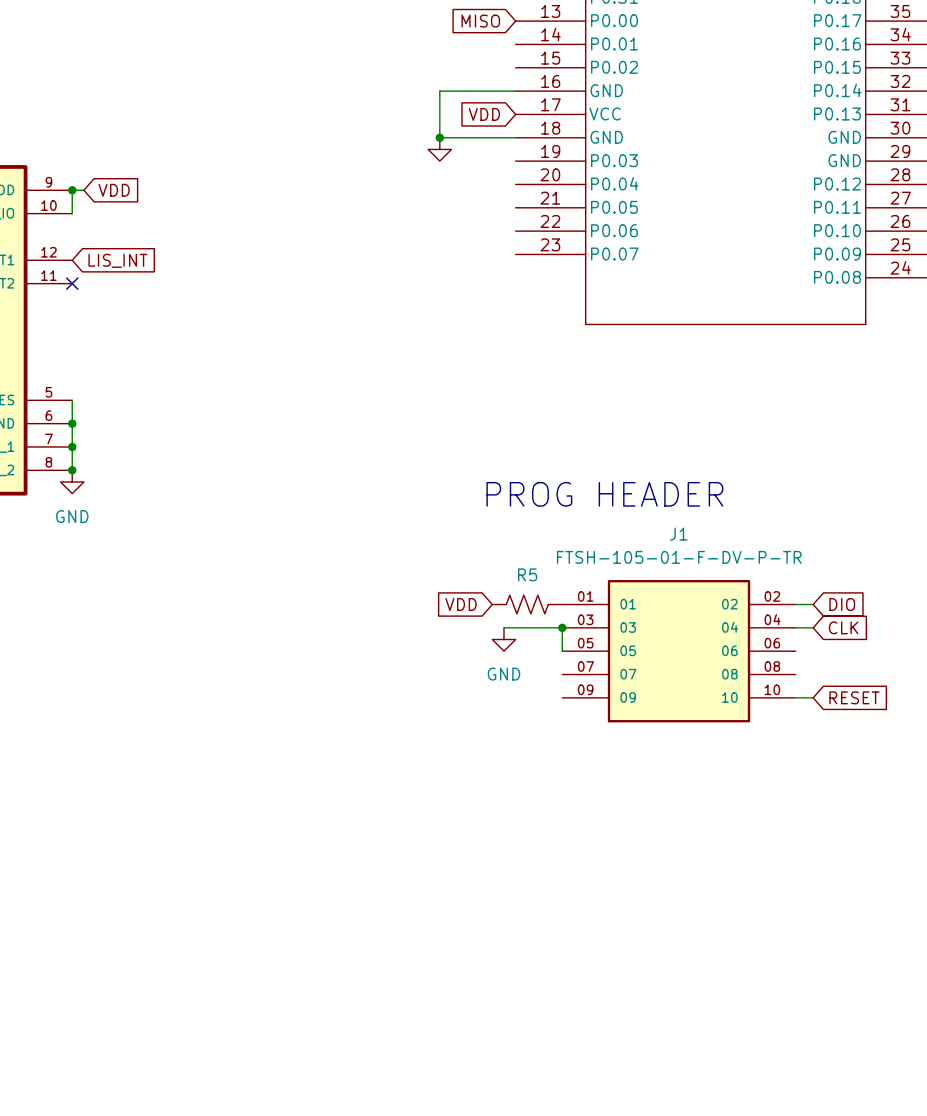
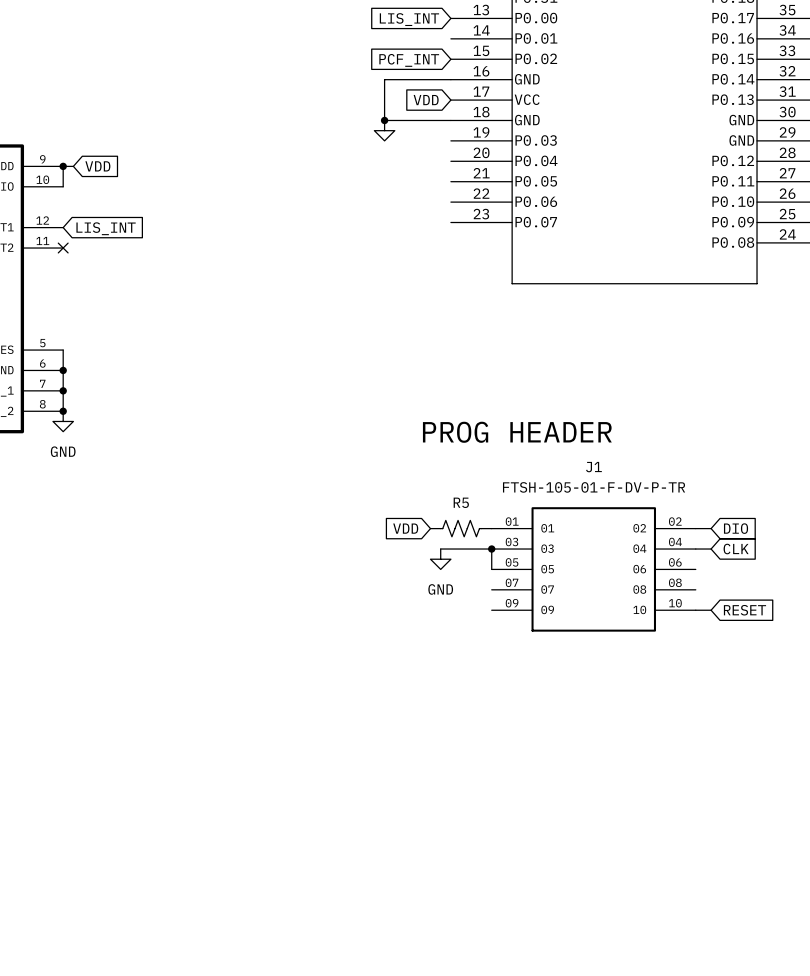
global label: MISO (480, 21) -> LIS_INT (409, 19)
global label: none -> PCF_INT (409, 60)

